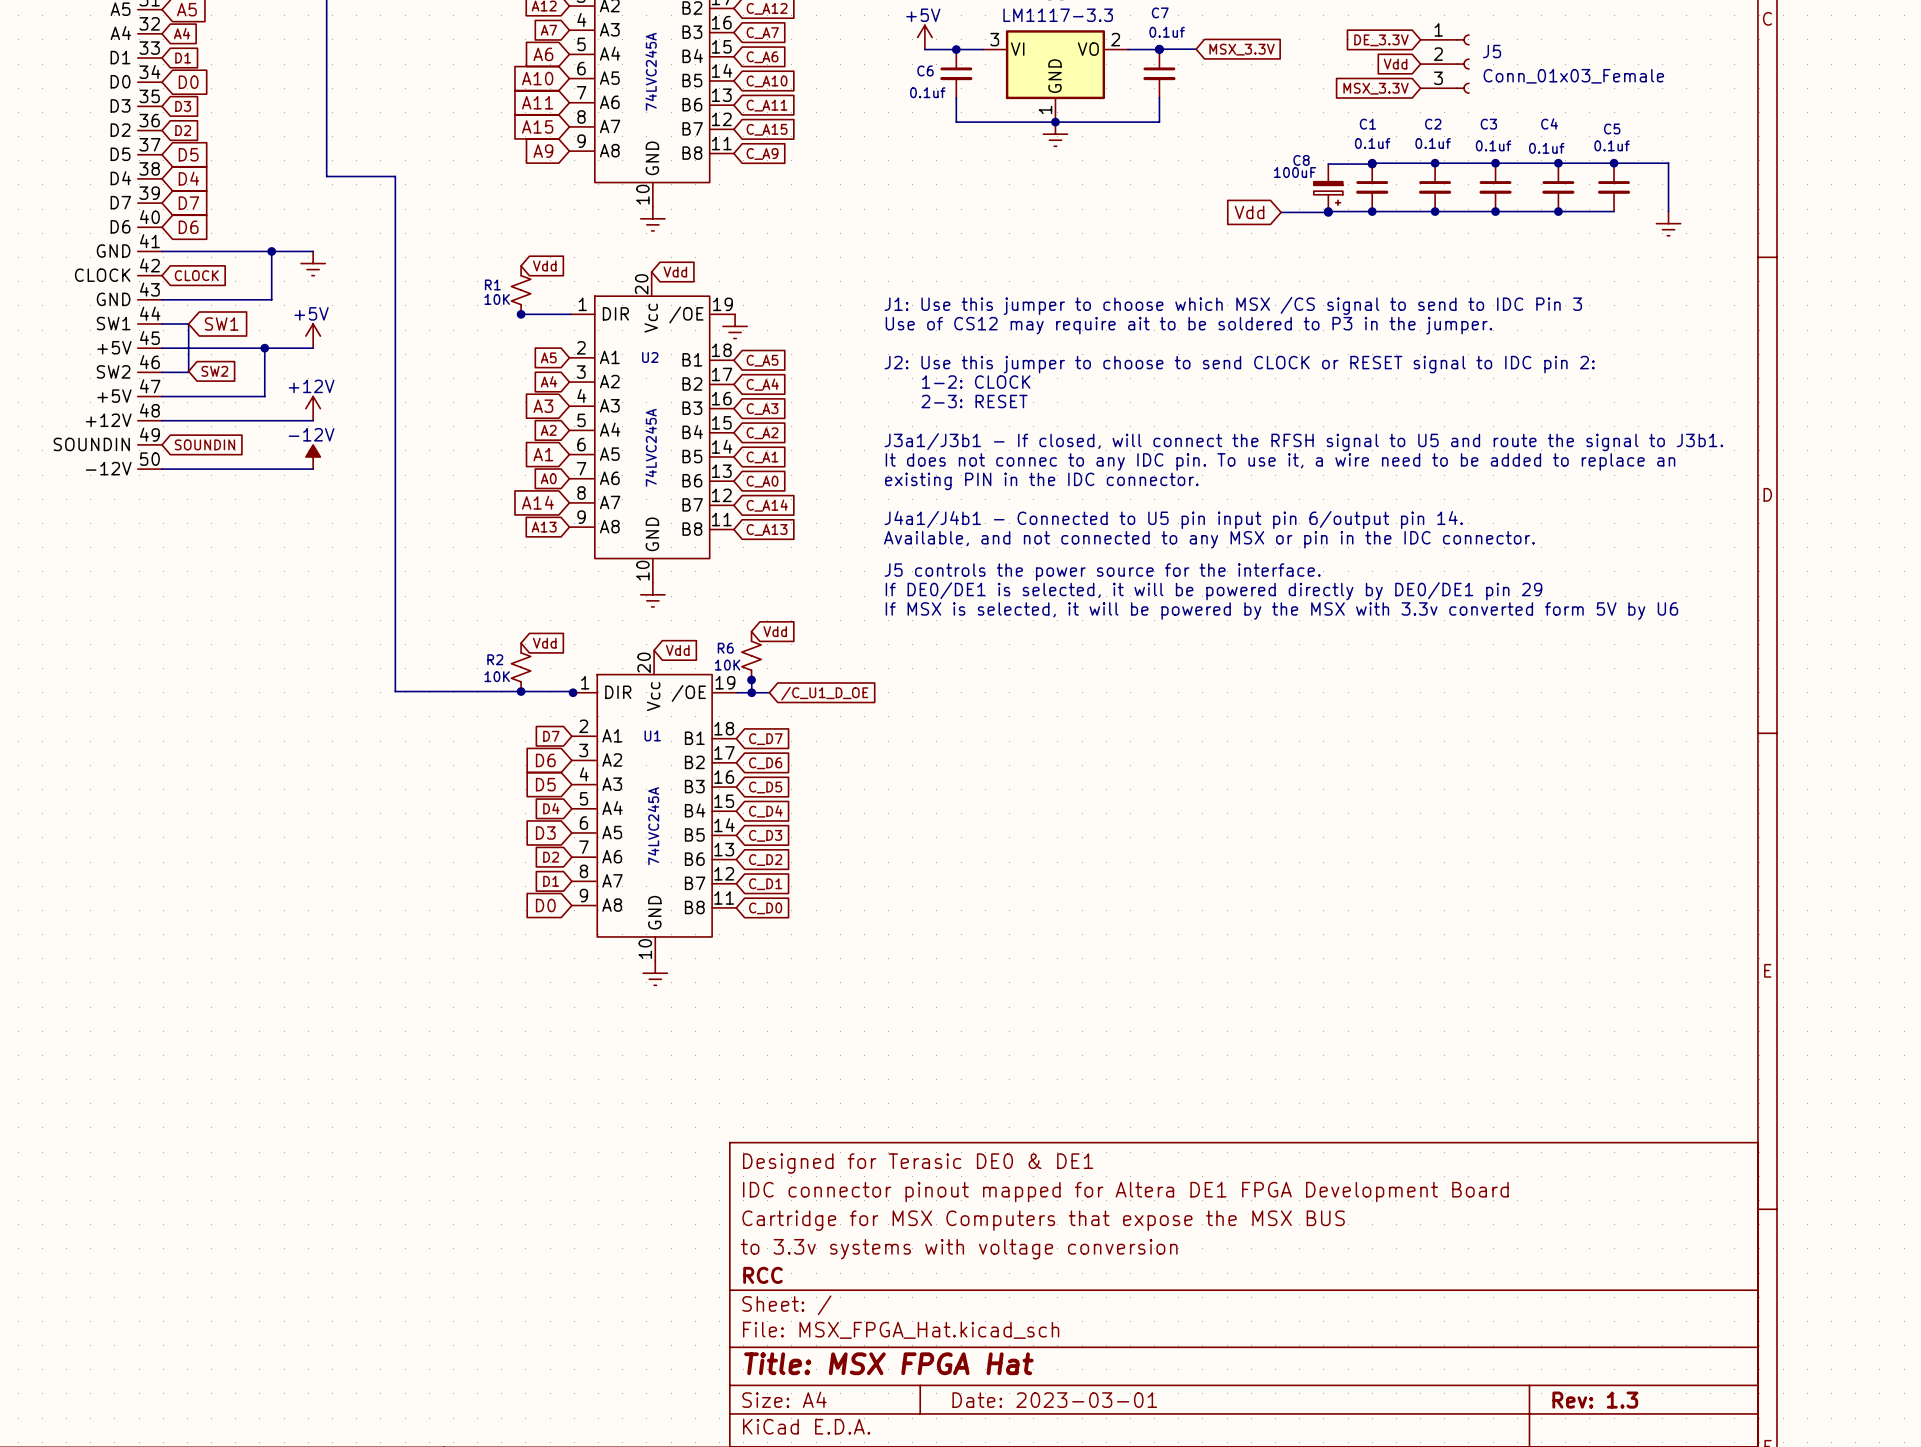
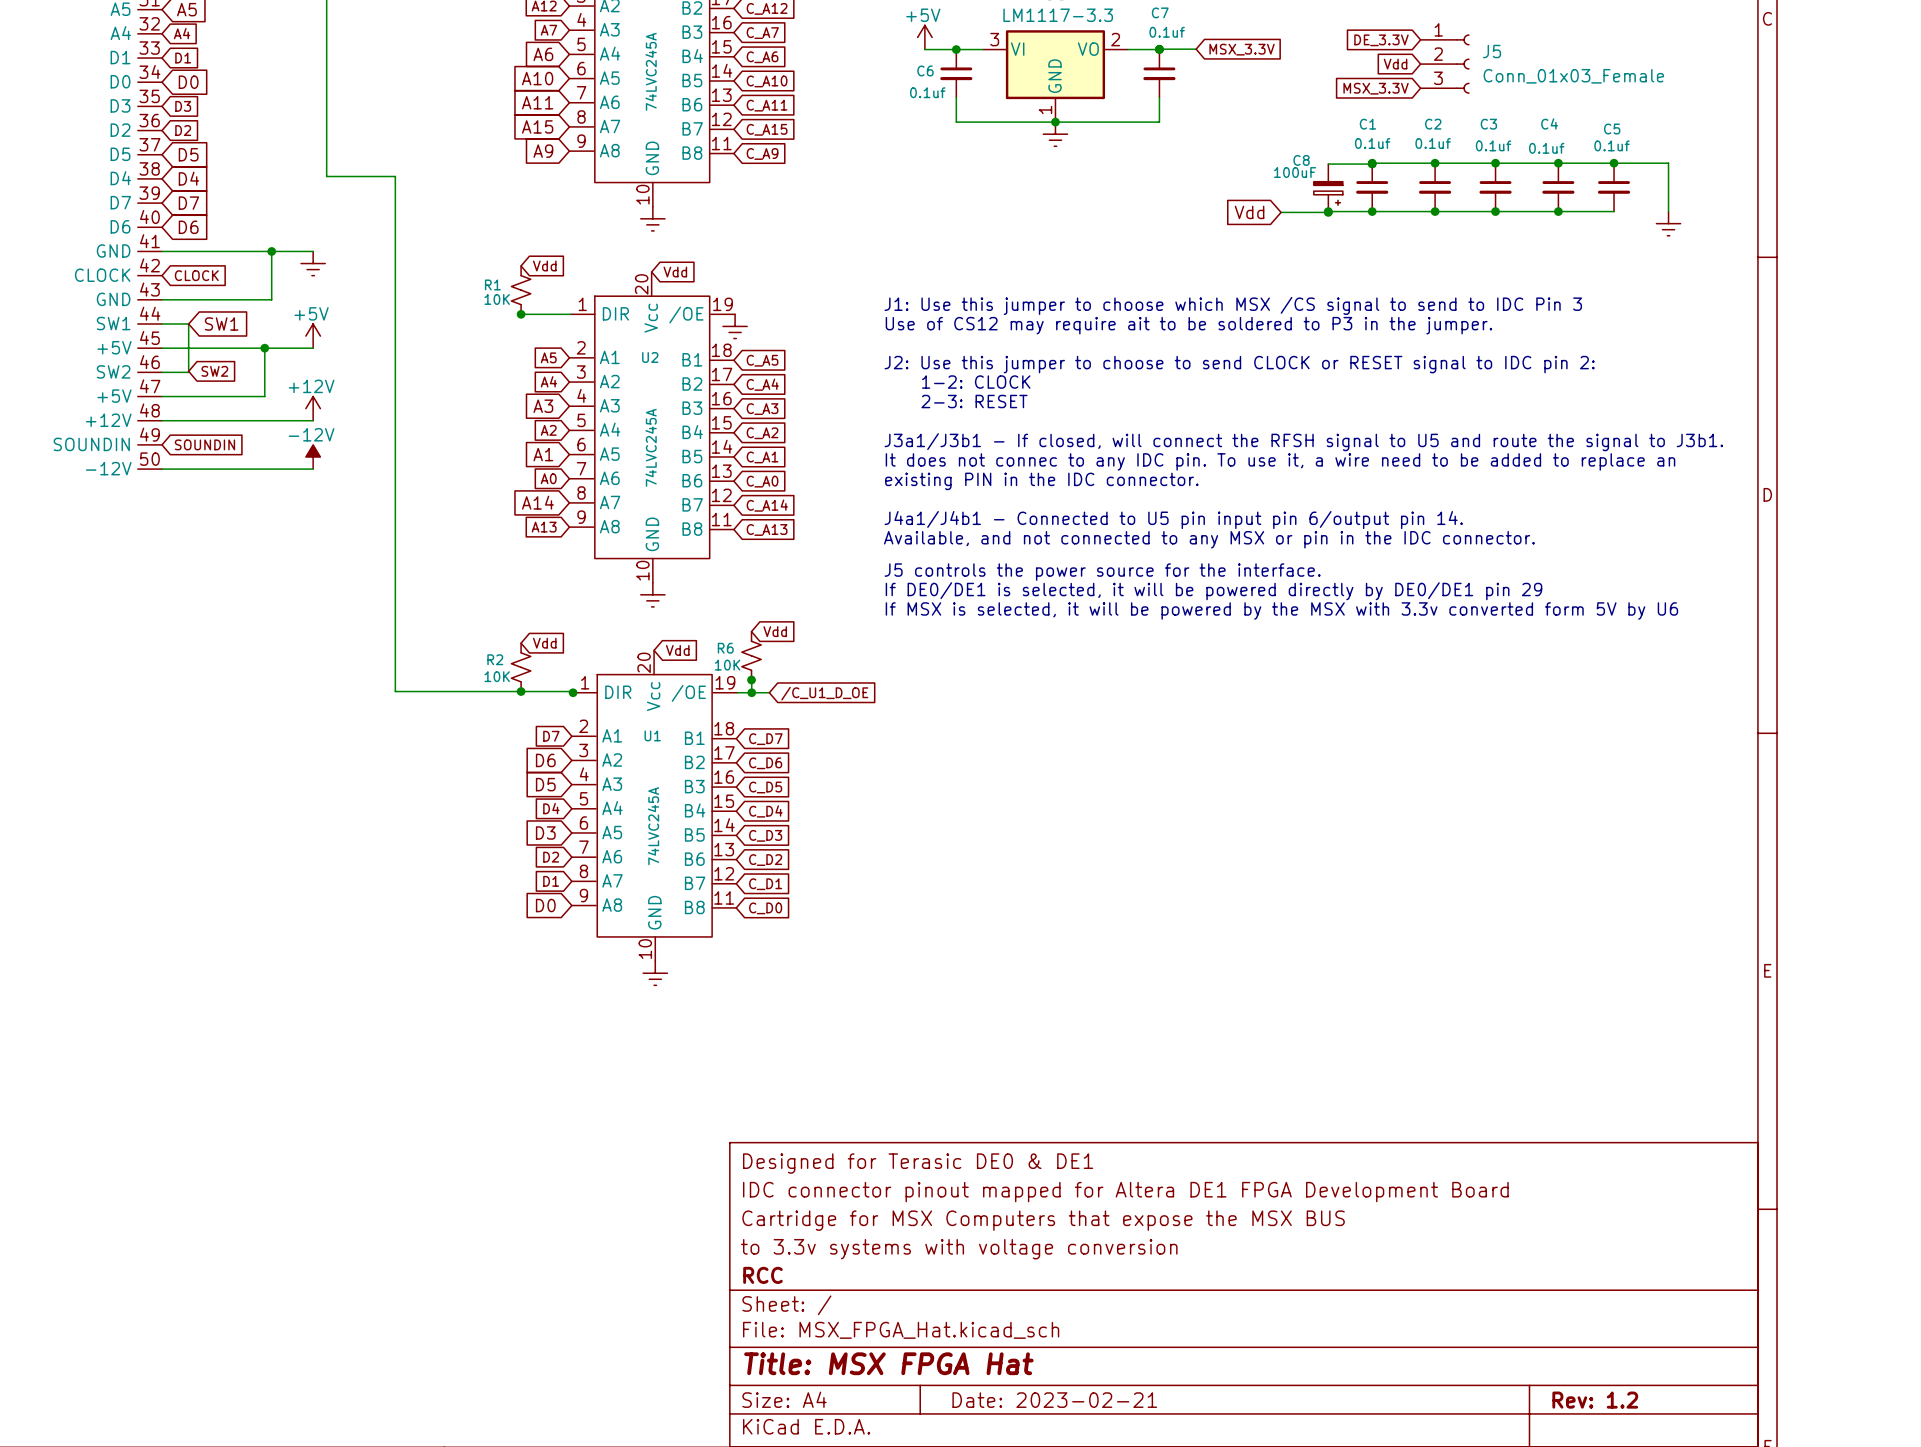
title block: Date: 2023-03-01 (1054, 1400) -> Date: 2023-02-21 (1054, 1400)
title block: Rev: 1.3 (1595, 1400) -> Rev: 1.2 (1595, 1400)

